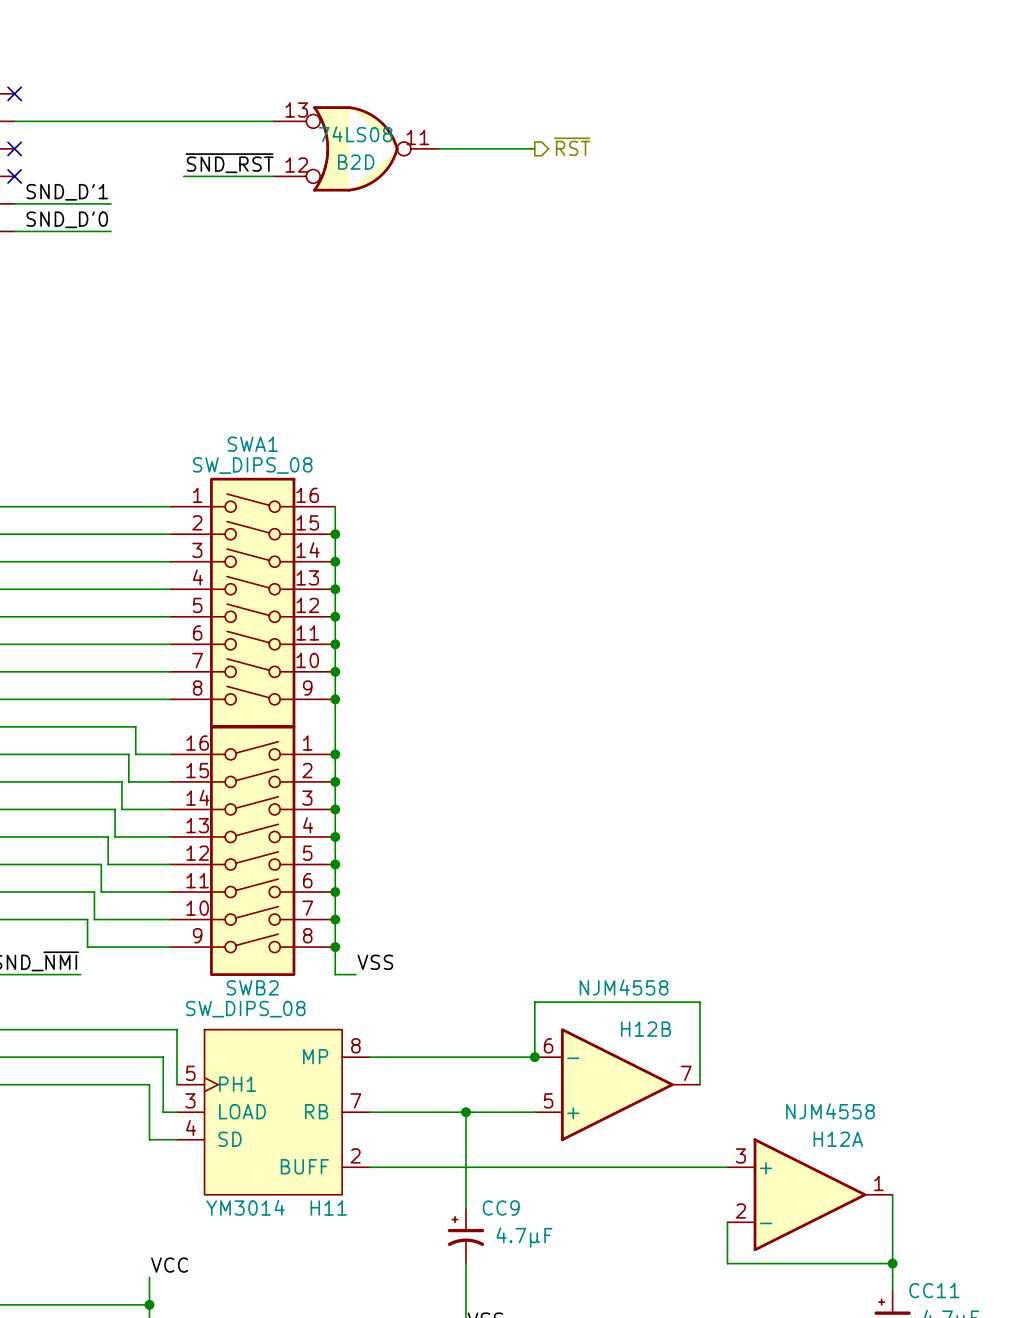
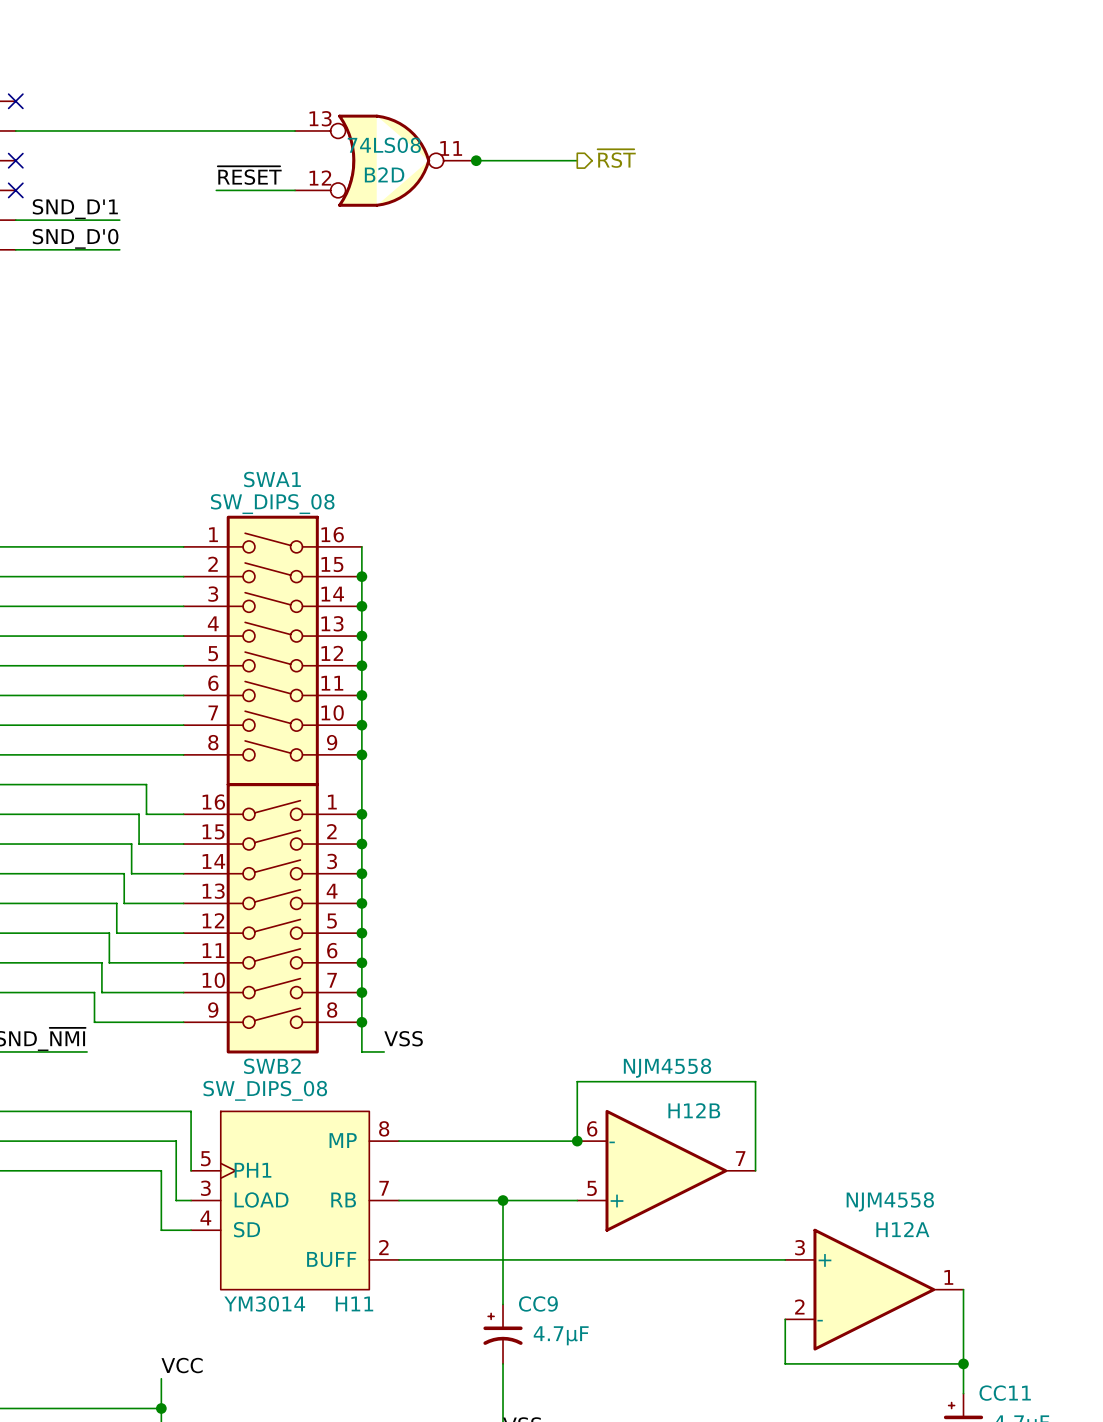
junction: none -> (476, 160)
label: none -> ~{RESET} (249, 175)
label: ~{SND_RST} (229, 163) -> none
wire: (183, 176) (200, 176) -> none

